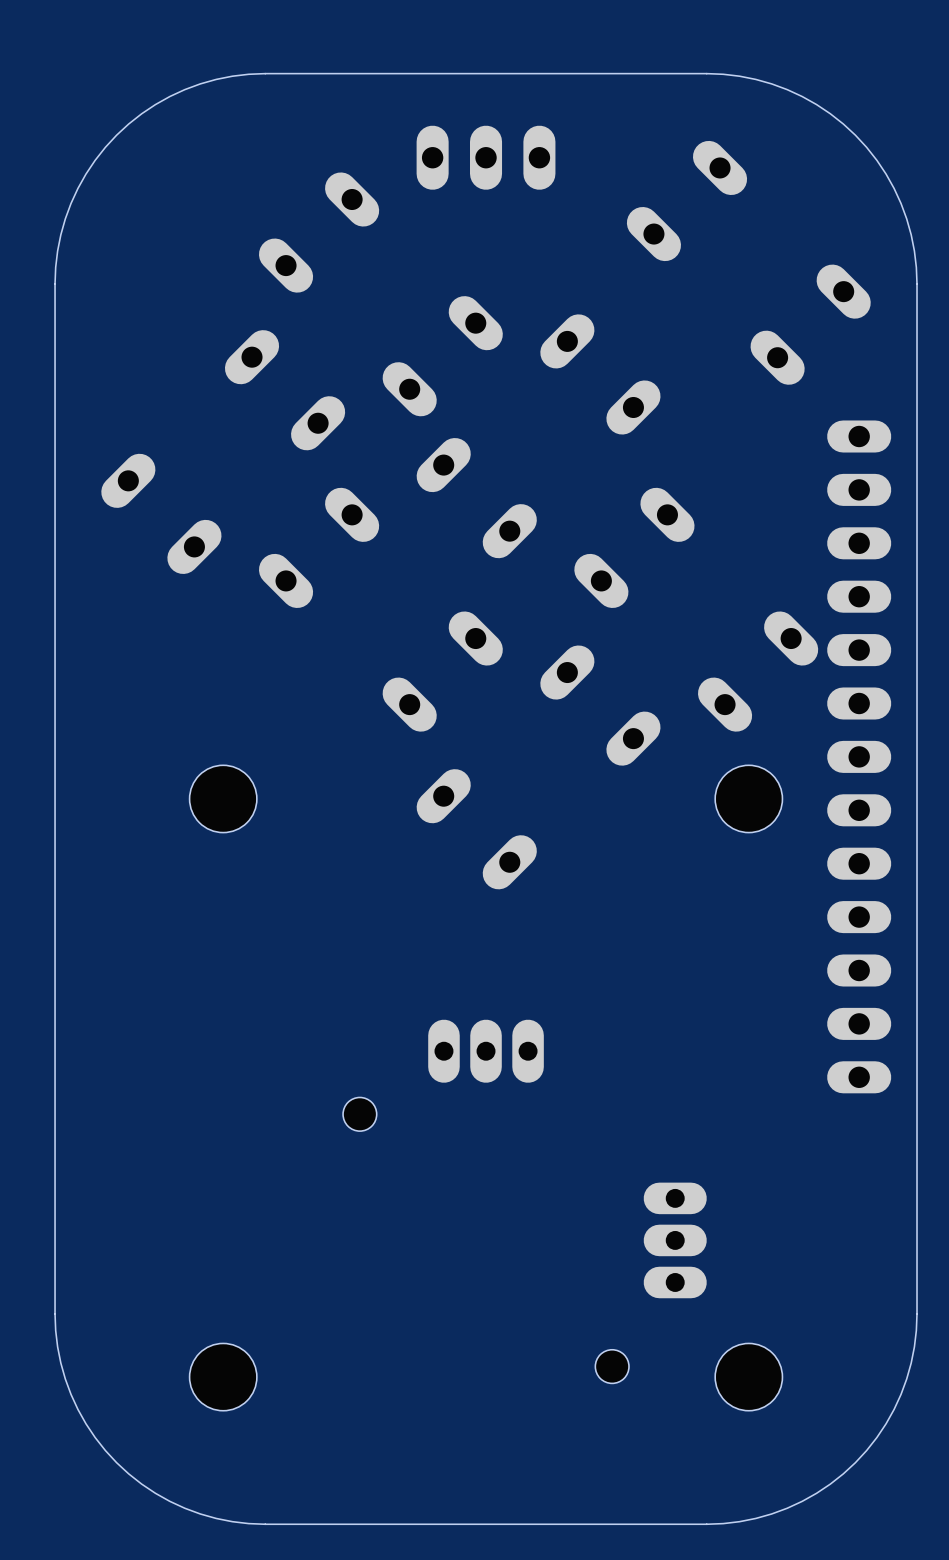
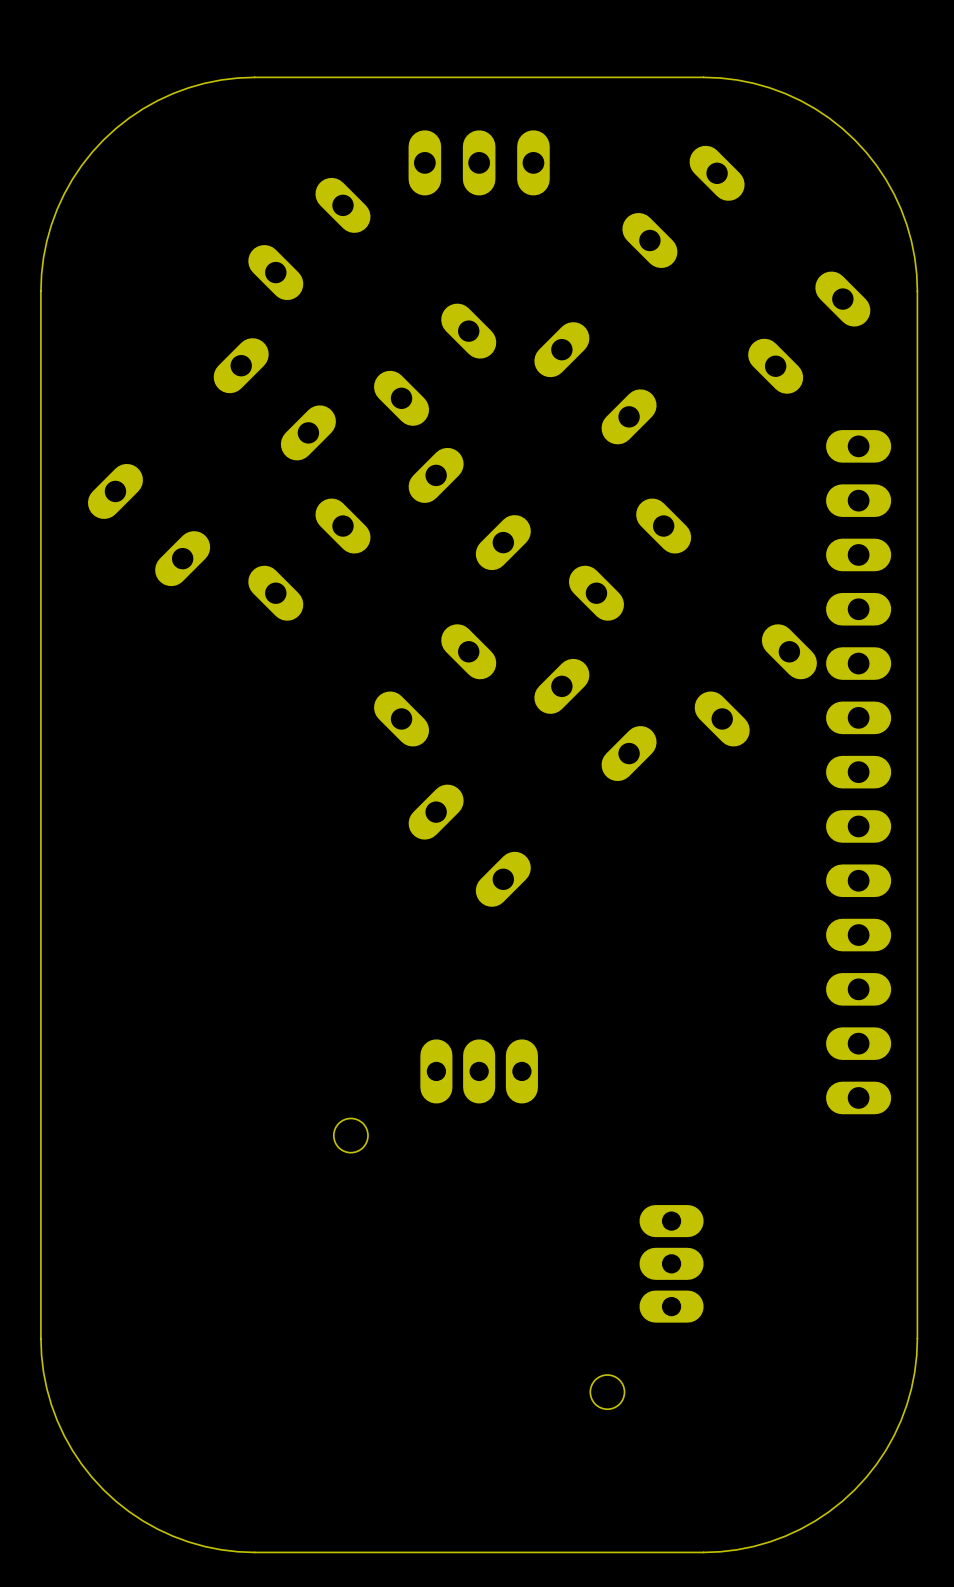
hole: (223, 798) -> none
hole: (748, 798) -> none
hole: (223, 1377) -> none
hole: (748, 1377) -> none

